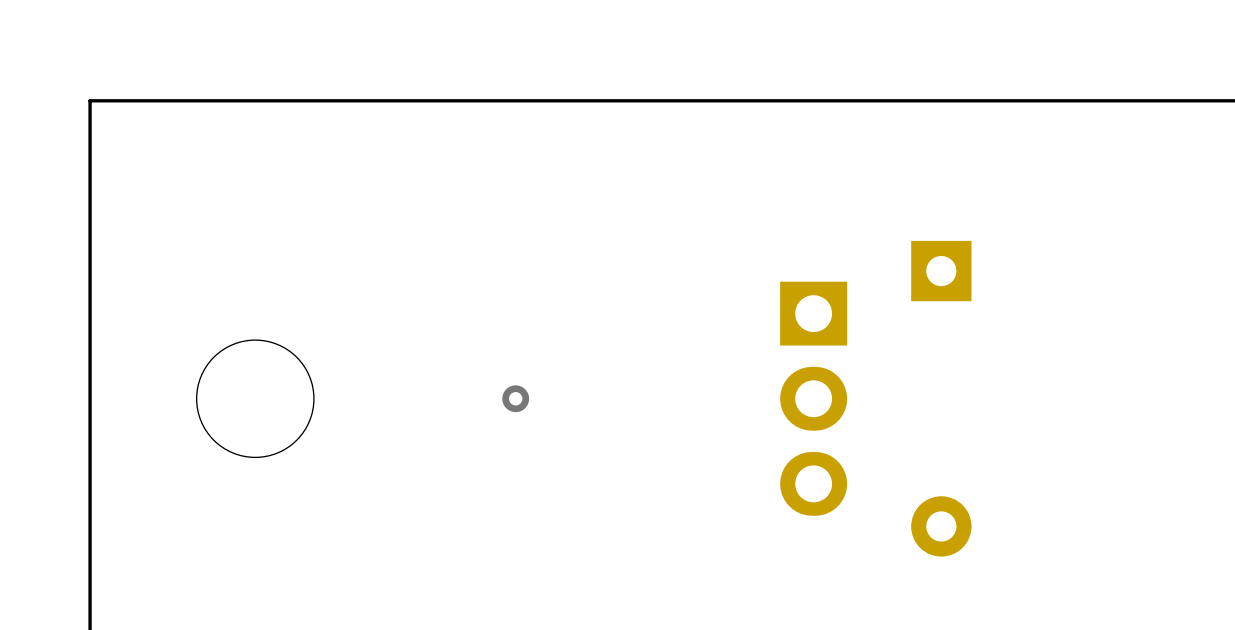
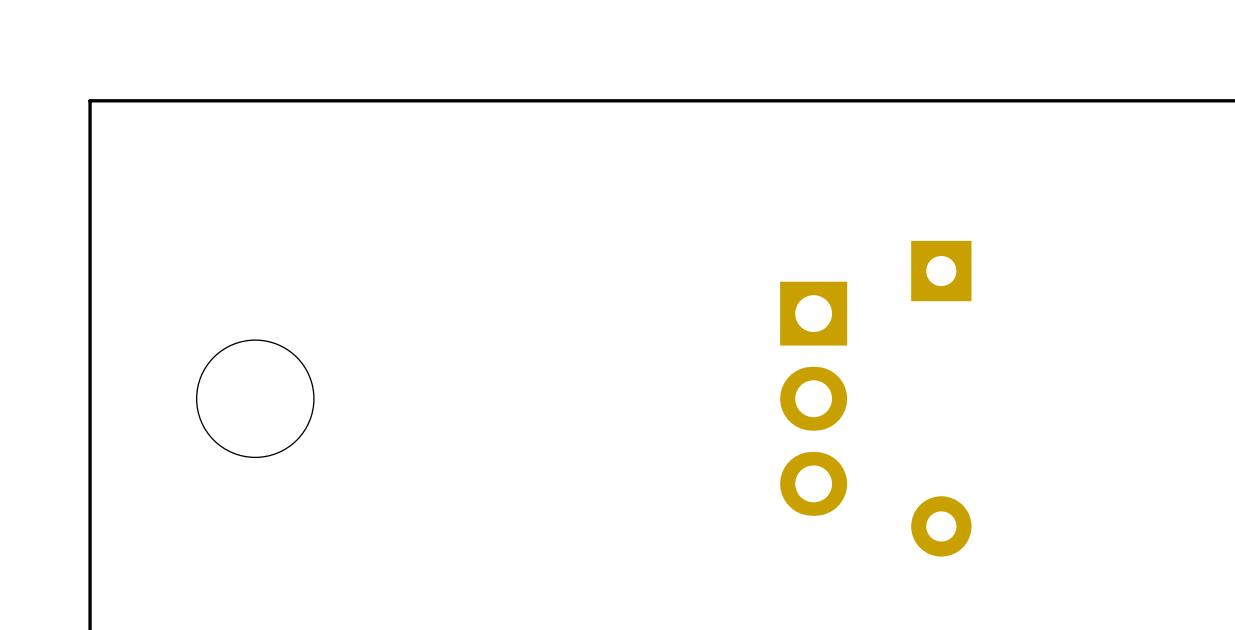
via: (515, 398) -> none

